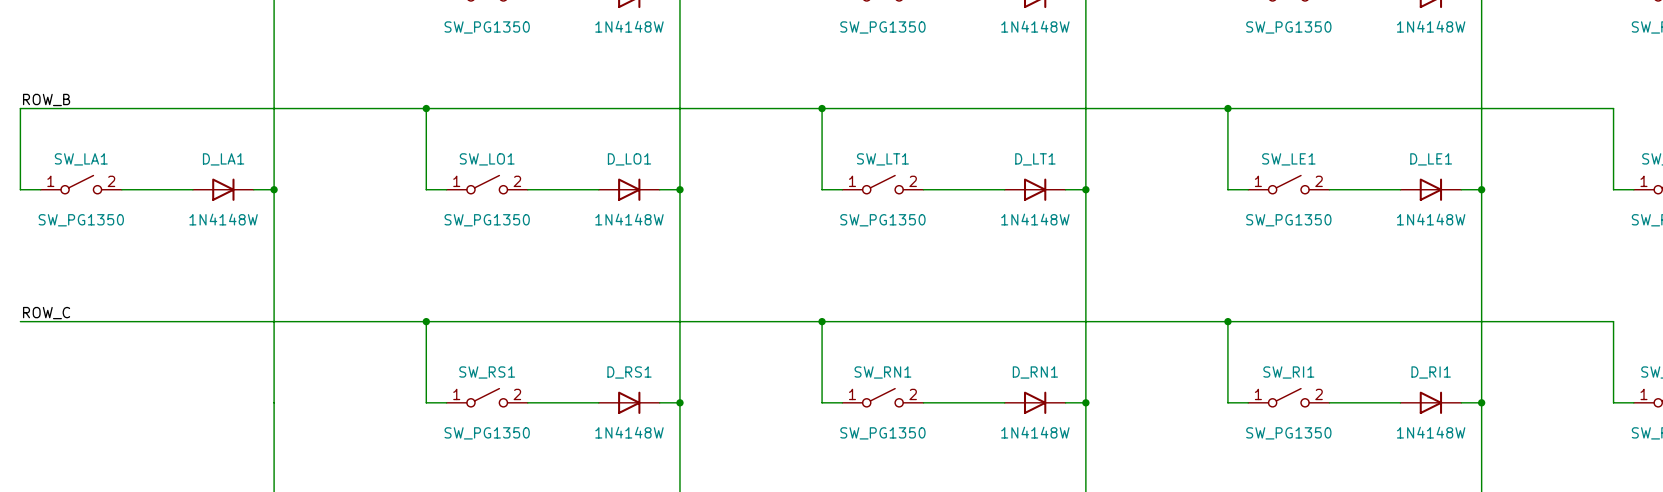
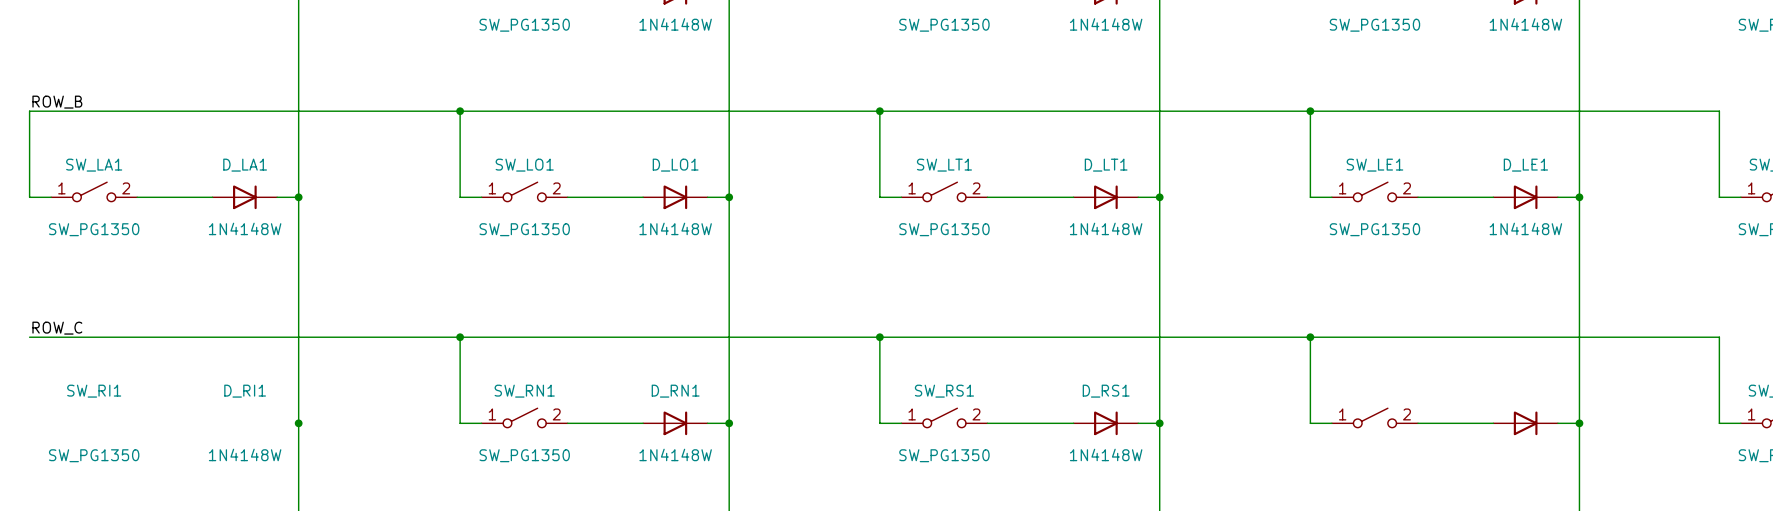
SW_RS1 name position: SW_RS1 (487, 372) -> SW_RS1 (944, 391)
D_RS1 name position: D_RS1 (629, 372) -> D_RS1 (1106, 391)
SW_RN1 name position: SW_RN1 (882, 372) -> SW_RN1 (524, 391)
D_RN1 name position: D_RN1 (1035, 372) -> D_RN1 (675, 391)
SW_RI1 name position: SW_RI1 (1288, 372) -> SW_RI1 (94, 391)
D_RI1 name position: D_RI1 (1431, 372) -> D_RI1 (245, 391)
junction: none -> (298, 423)
D_RI1 value position: 1N4148W (1431, 432) -> 1N4148W (245, 454)
SW_RI1 value position: SW_PG1350 (1288, 433) -> SW_PG1350 (94, 455)

